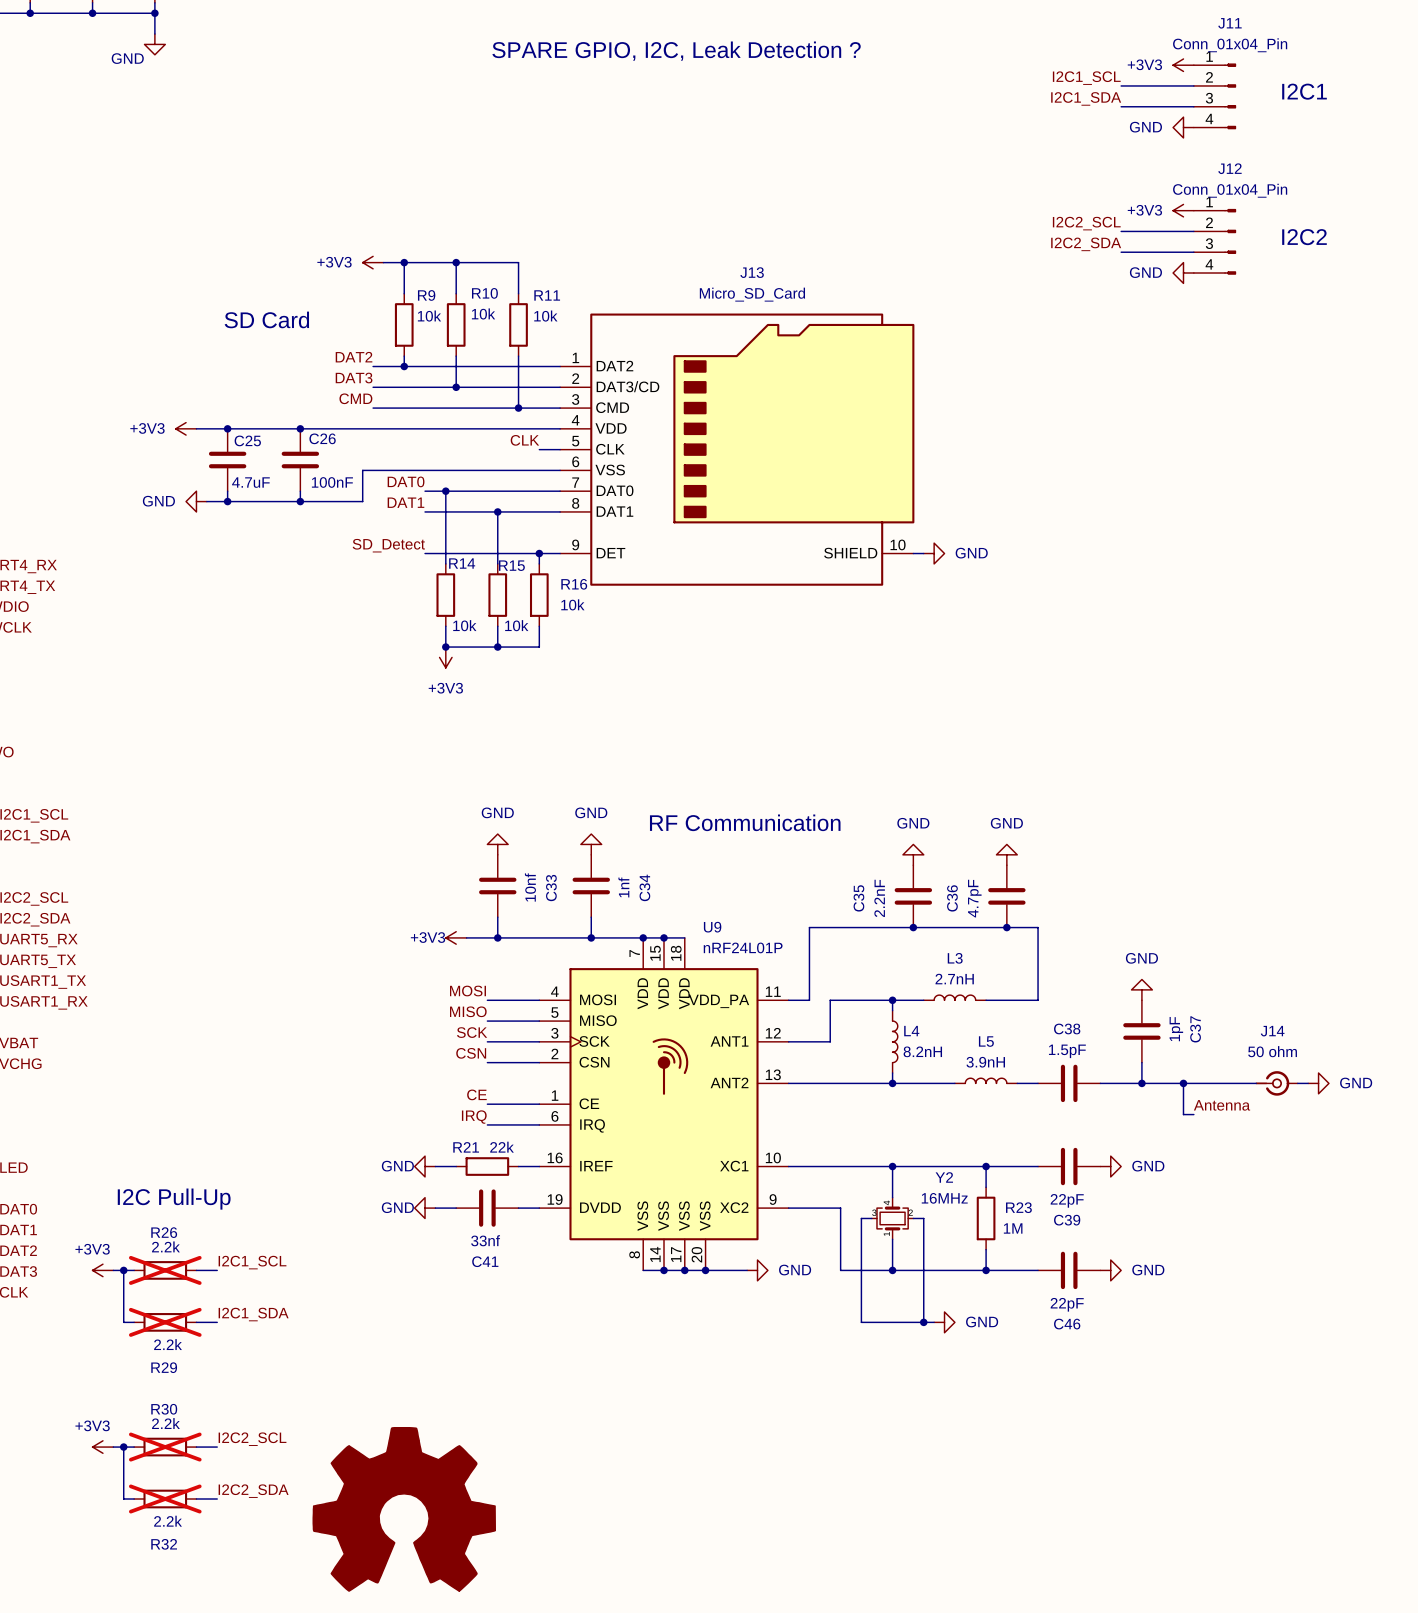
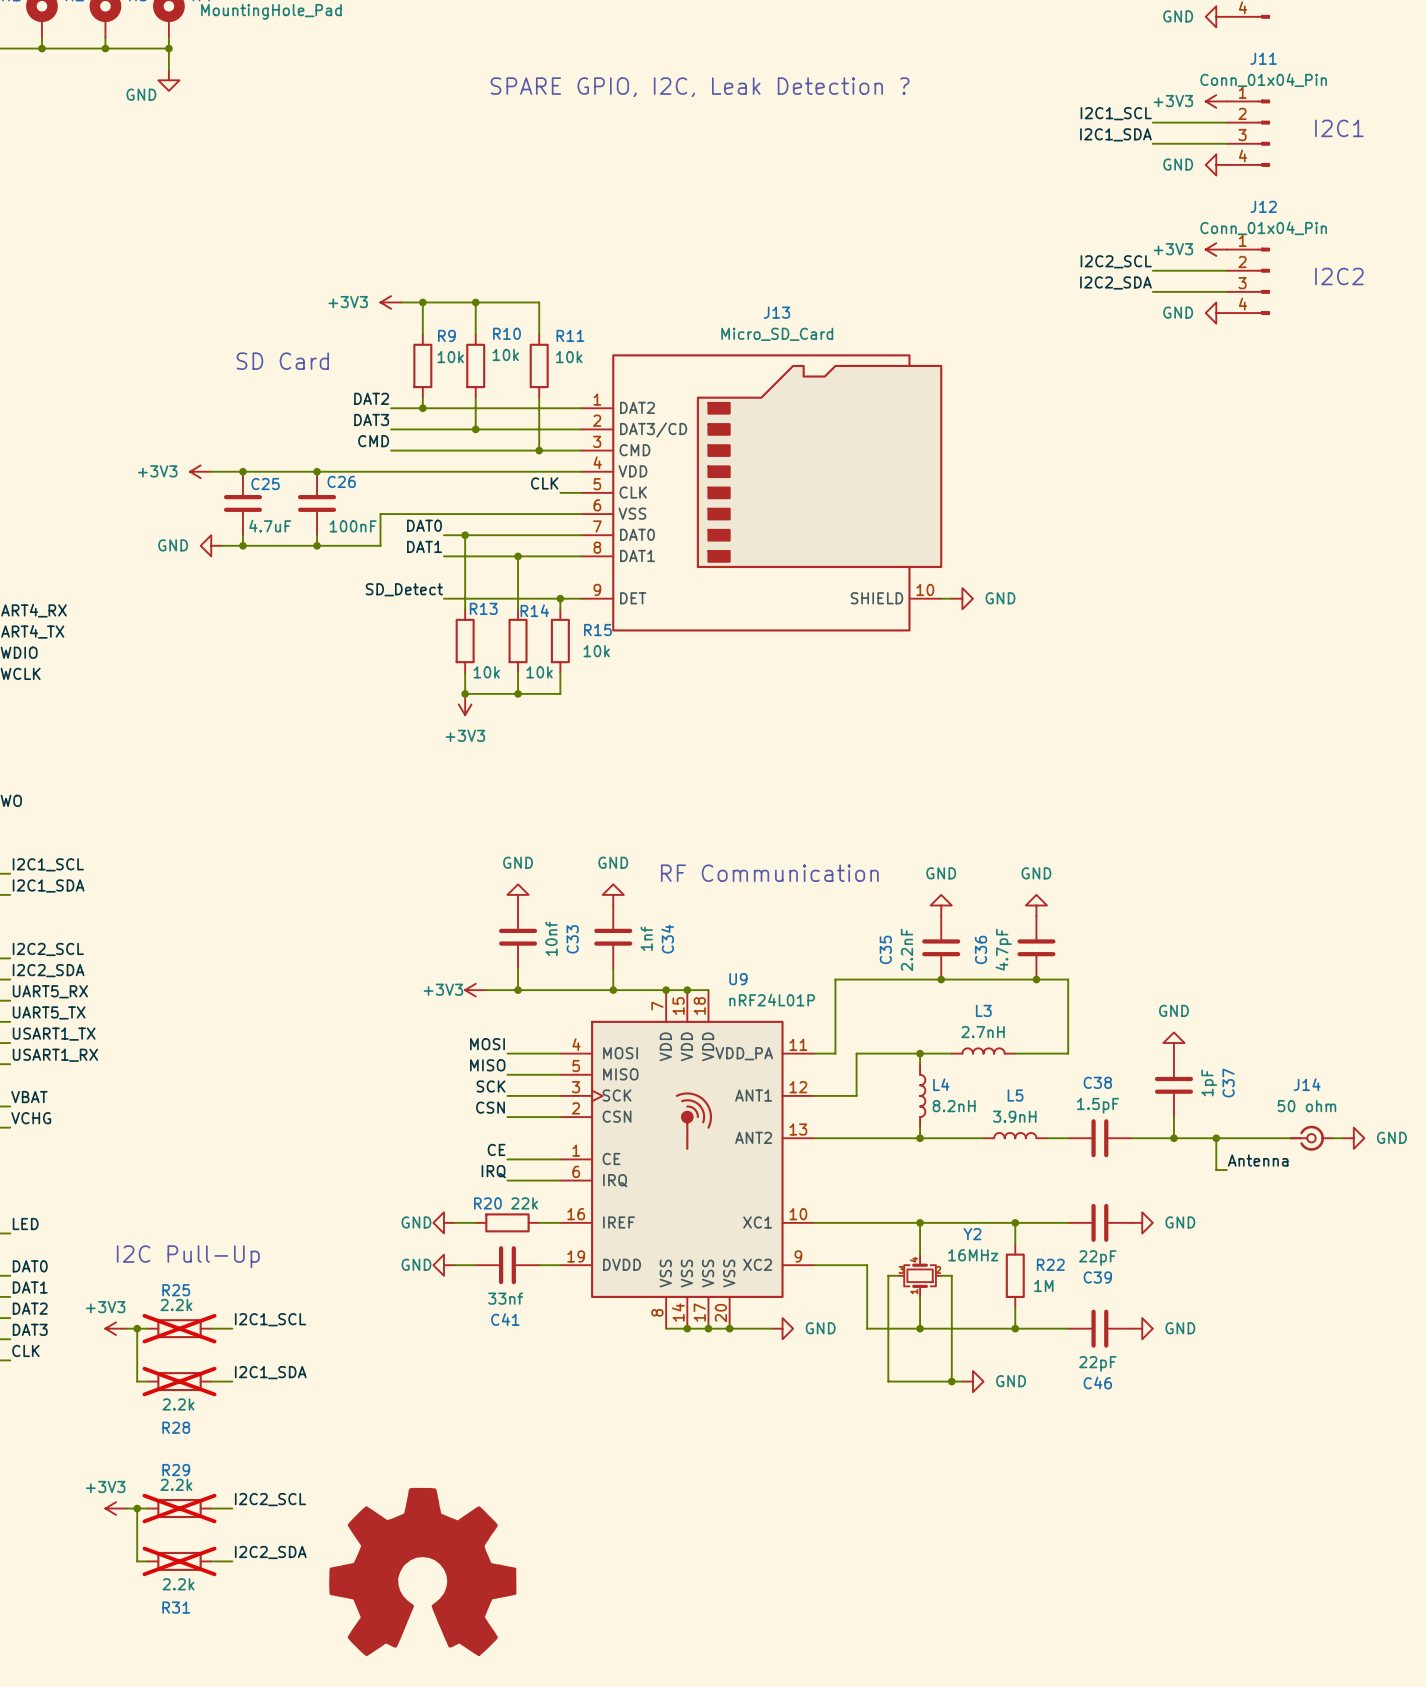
R14 name: R14 (462, 563) -> R13 (483, 608)
R15 name: R15 (511, 565) -> R14 (534, 610)
R16 name: R16 (574, 584) -> R15 (597, 630)
R21 name: R21 (466, 1147) -> R20 (487, 1203)
R23 name: R23 (1018, 1207) -> R22 (1050, 1264)
R26 name: R26 (164, 1232) -> R25 (176, 1290)
R29 name: R29 (164, 1367) -> R28 (176, 1427)
R30 name: R30 (164, 1409) -> R29 (176, 1470)
R32 name: R32 (164, 1544) -> R31 (176, 1607)

